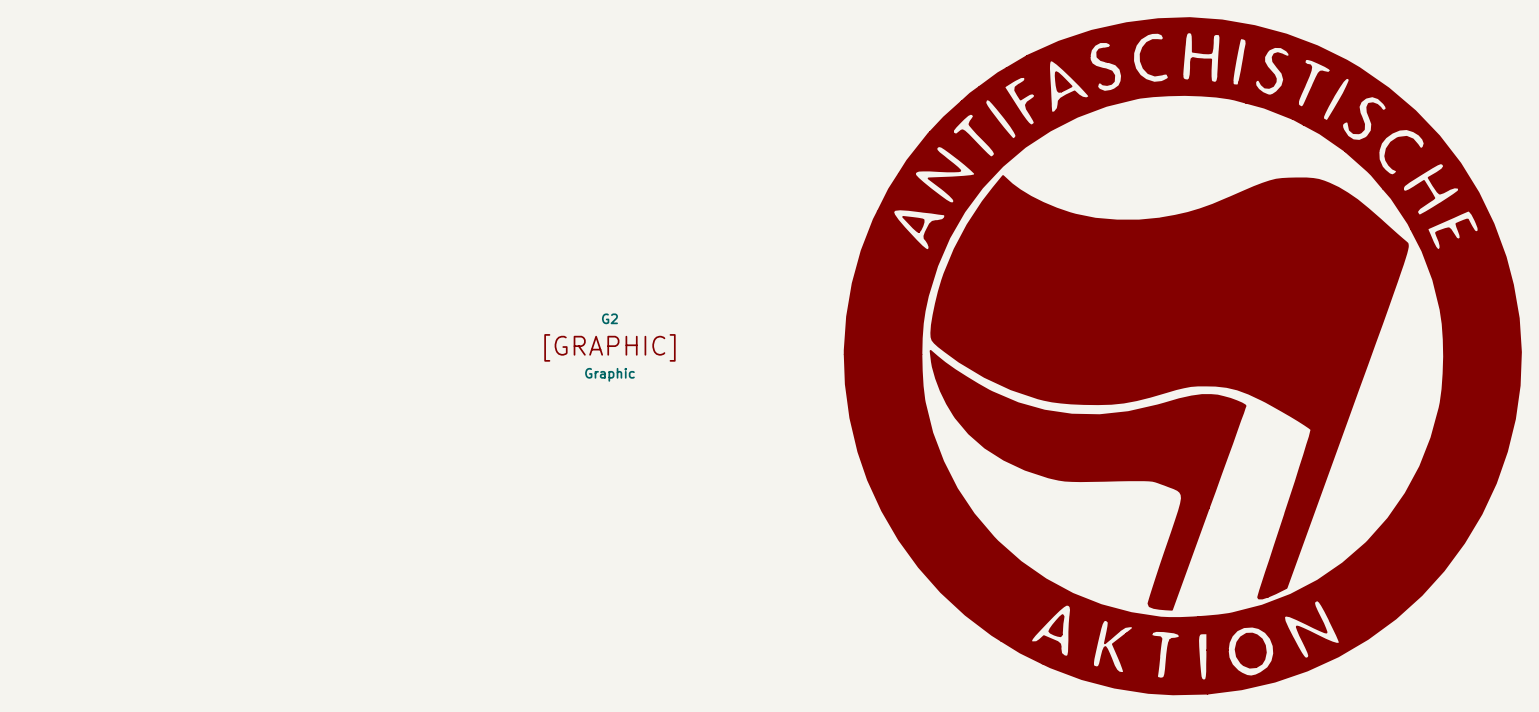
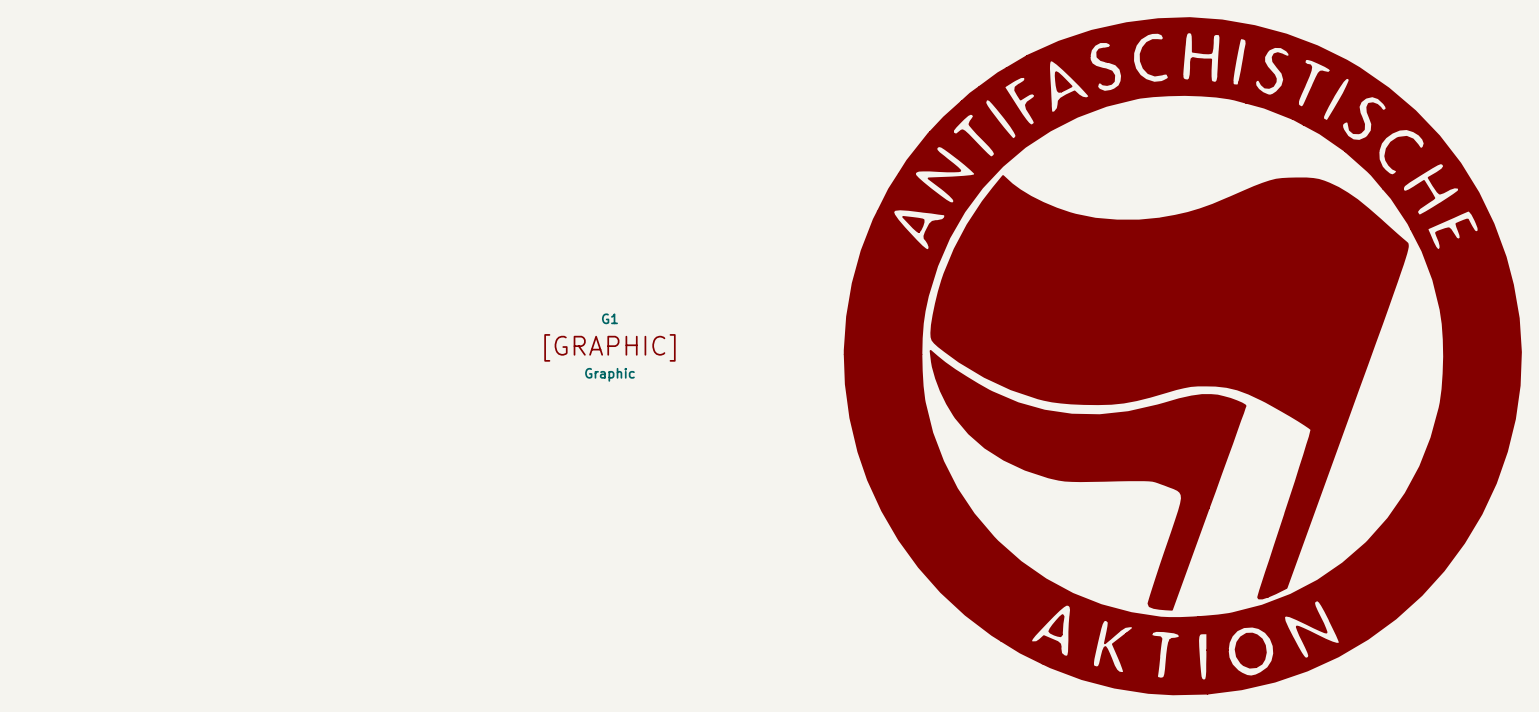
G2 name: G2 (609, 318) -> G1 (609, 318)

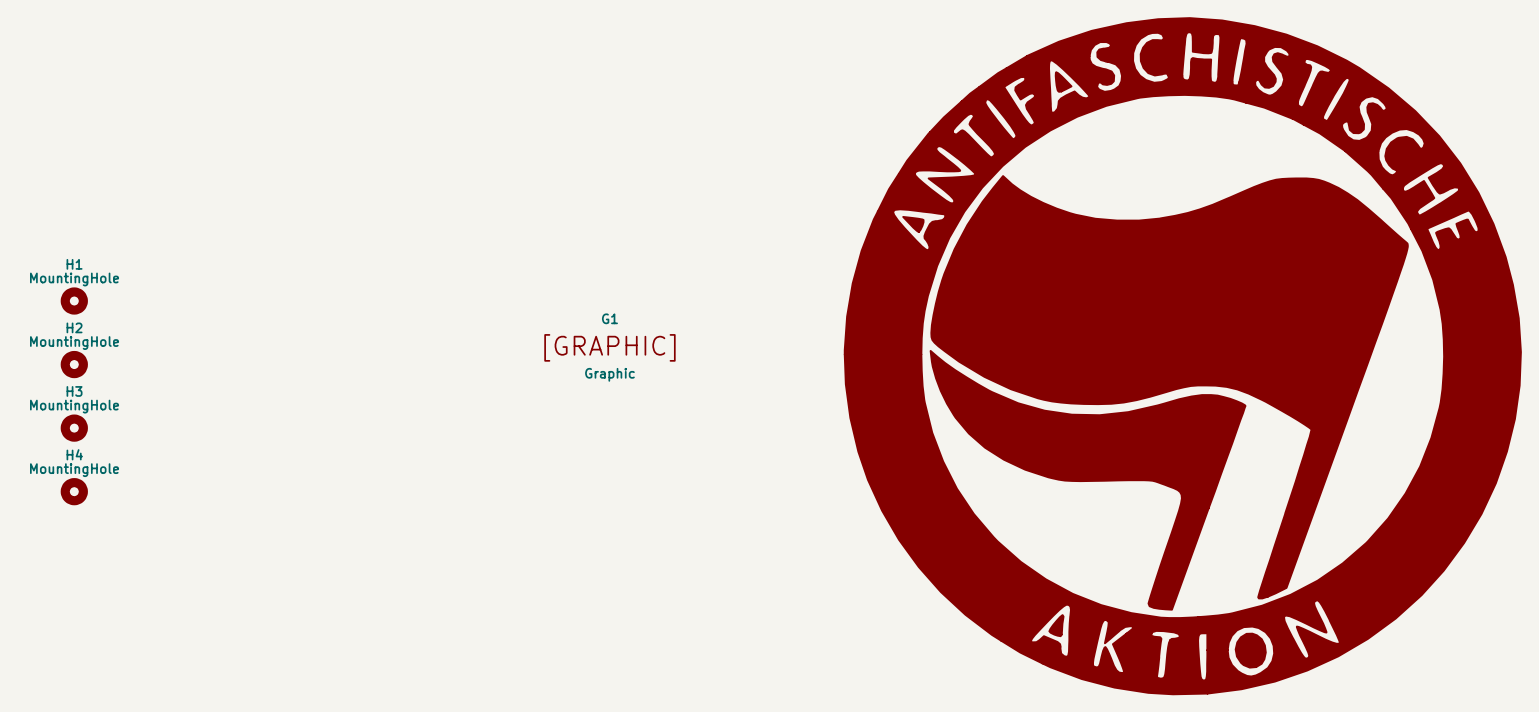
H1: none -> MountingHole (74, 301)
H2: none -> MountingHole (74, 364)
H3: none -> MountingHole (74, 428)
H4: none -> MountingHole (74, 491)

